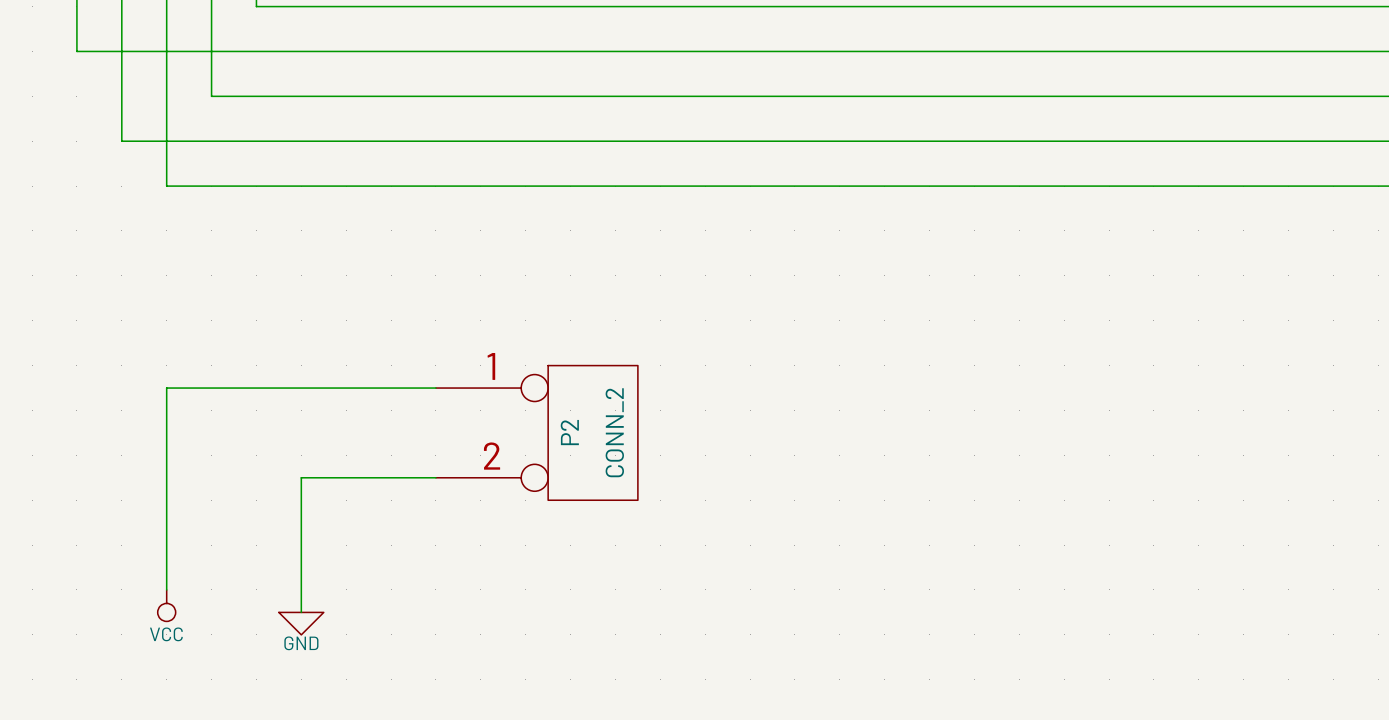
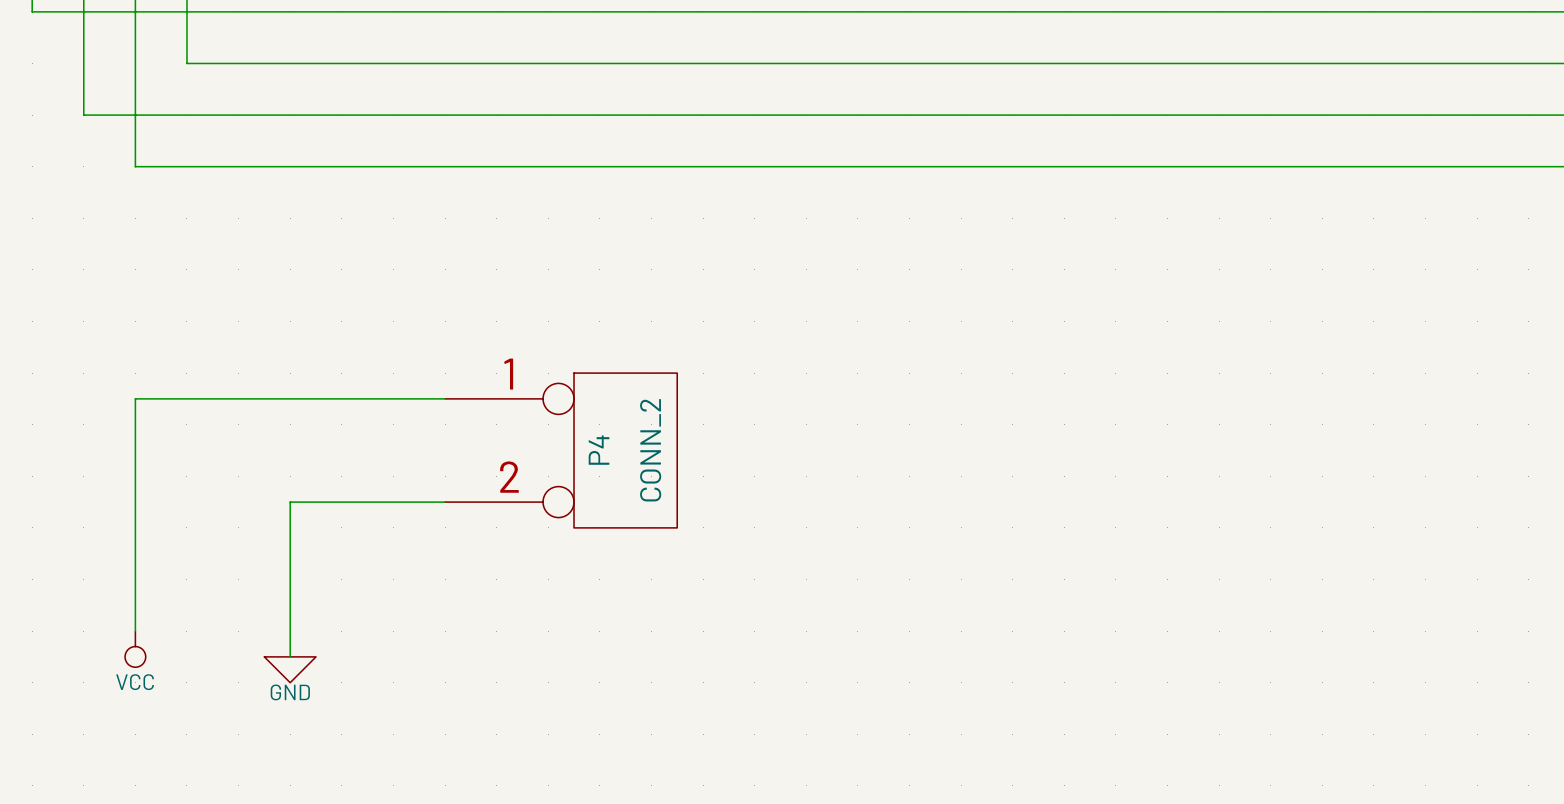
P2 name: P2 (569, 432) -> P4 (599, 450)

